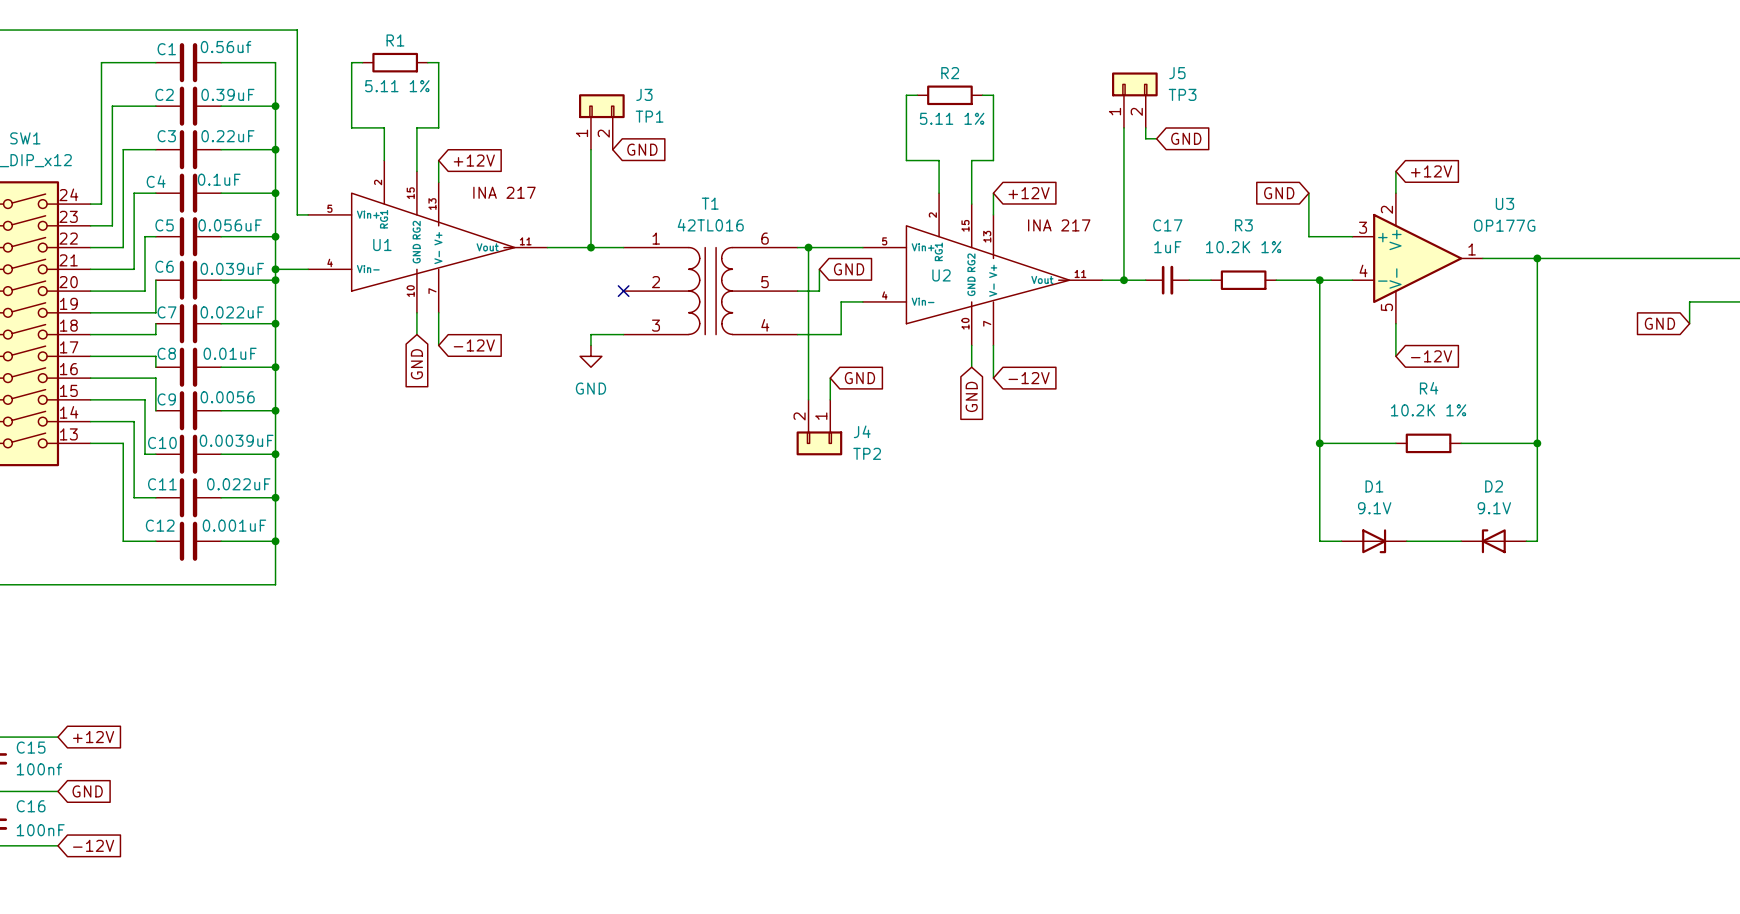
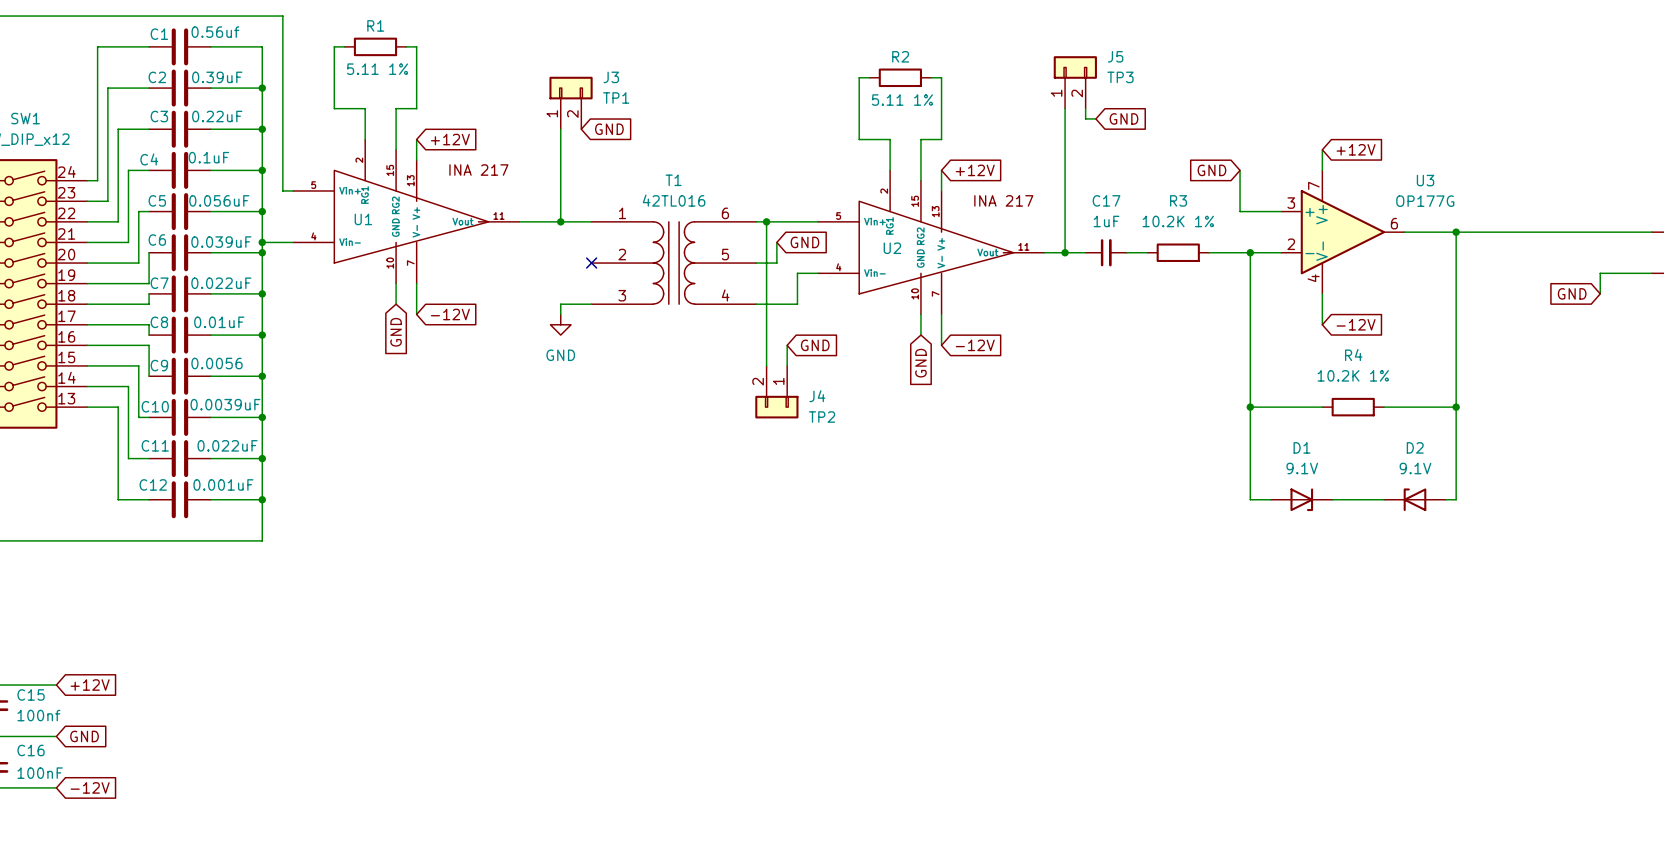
U3 pin number: 2 (1386, 209) -> 7 (1313, 185)
U3 pin number: 1 (1472, 249) -> 6 (1394, 223)
U3 pin number: 4 (1363, 270) -> 2 (1291, 244)
U3 pin number: 5 (1386, 307) -> 4 (1313, 278)

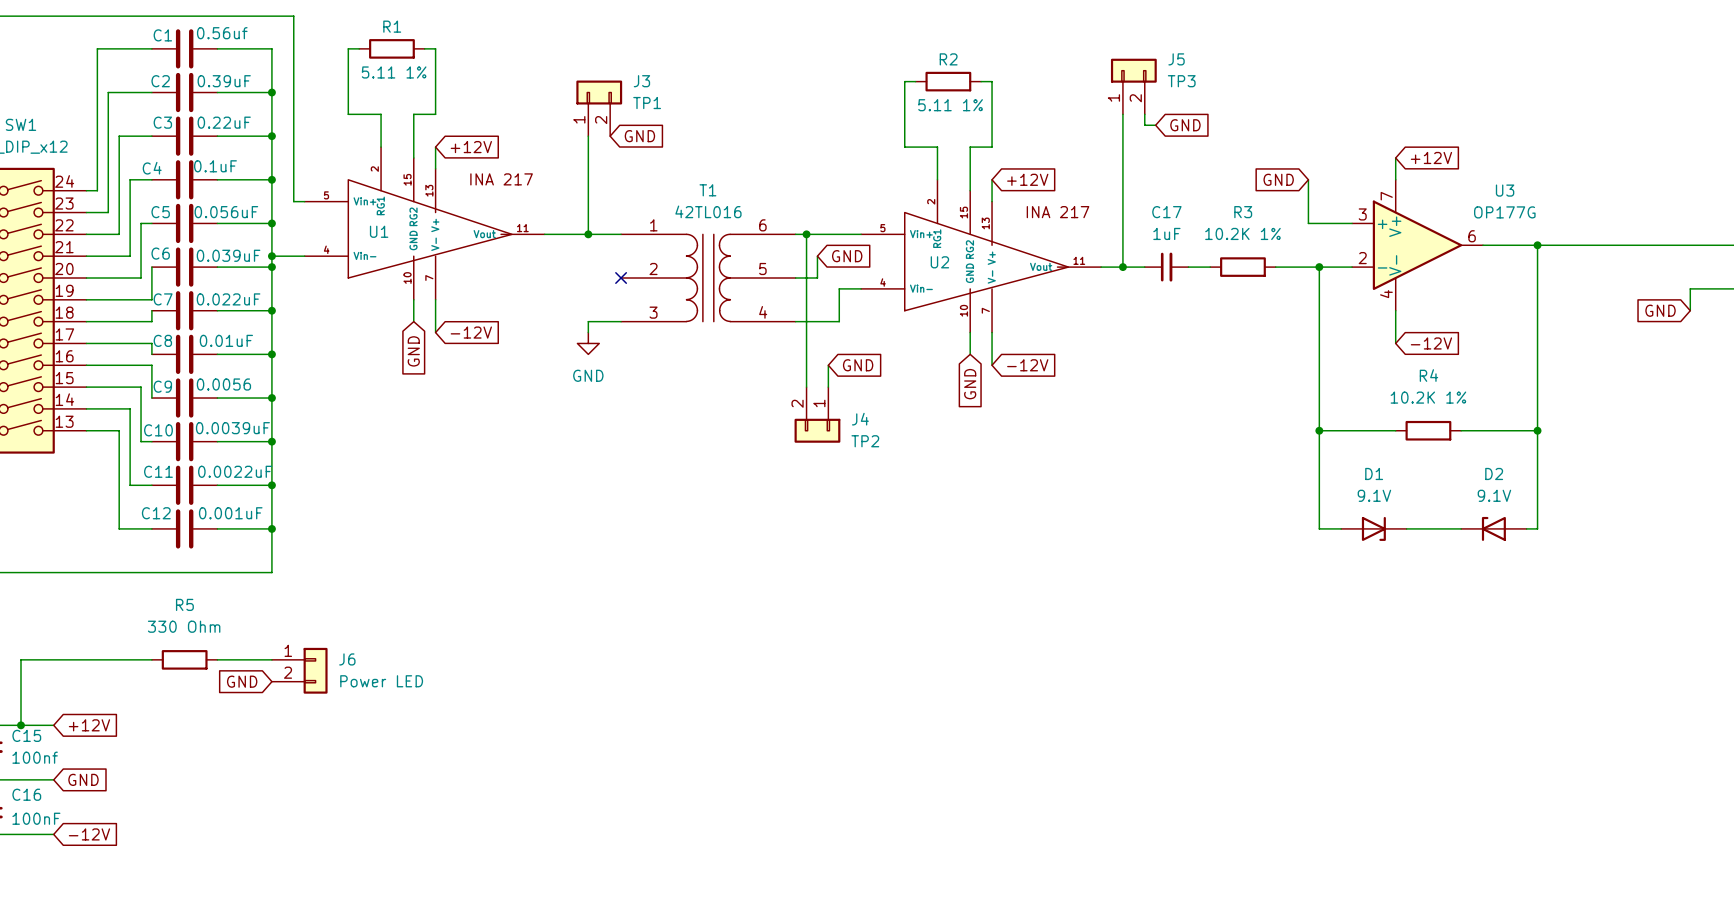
C11 value: 0.022uF (227, 445) -> 0.0022uF (235, 471)
wire: none -> (151, 659) (21, 659) (21, 725)
R5: none -> 330 Ohm (184, 659)
wire: none -> (217, 659) (271, 659)
J6: none -> Power LED (299, 670)
global label: none -> GND (242, 681)
junction: none -> (21, 725)

